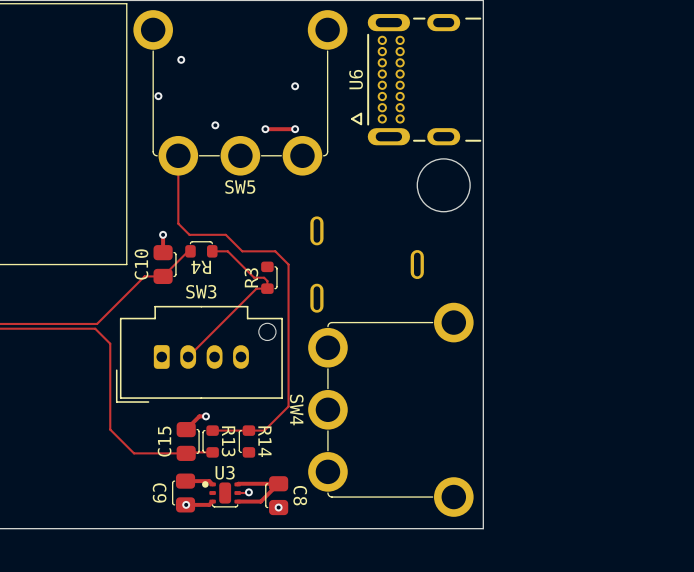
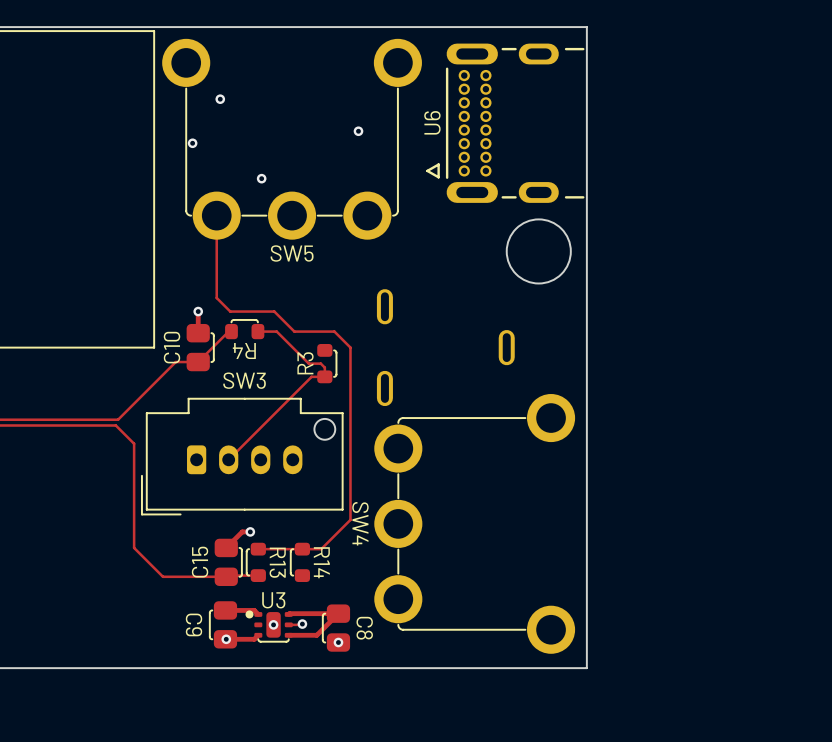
track: (265, 129) (295, 129) -> none
via: (265, 129) -> none
via: (295, 129) -> none
via: none -> (273, 624)

